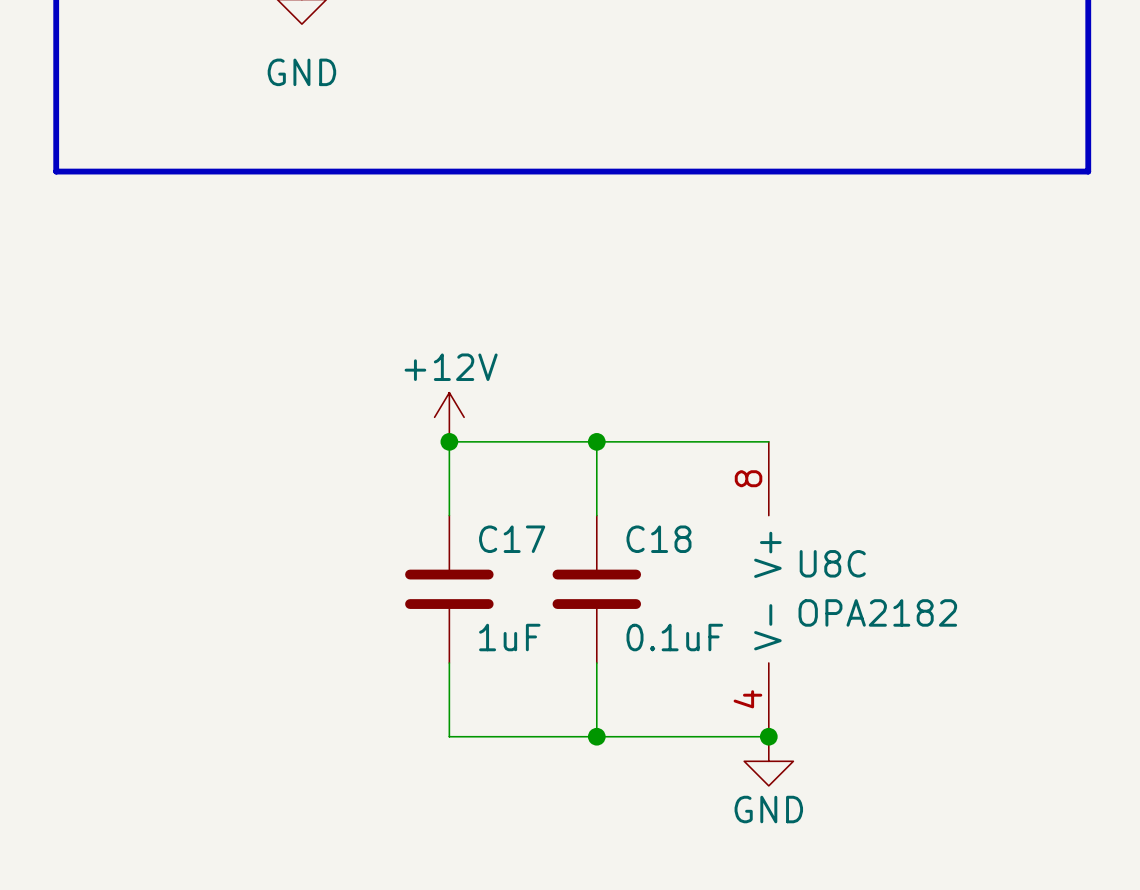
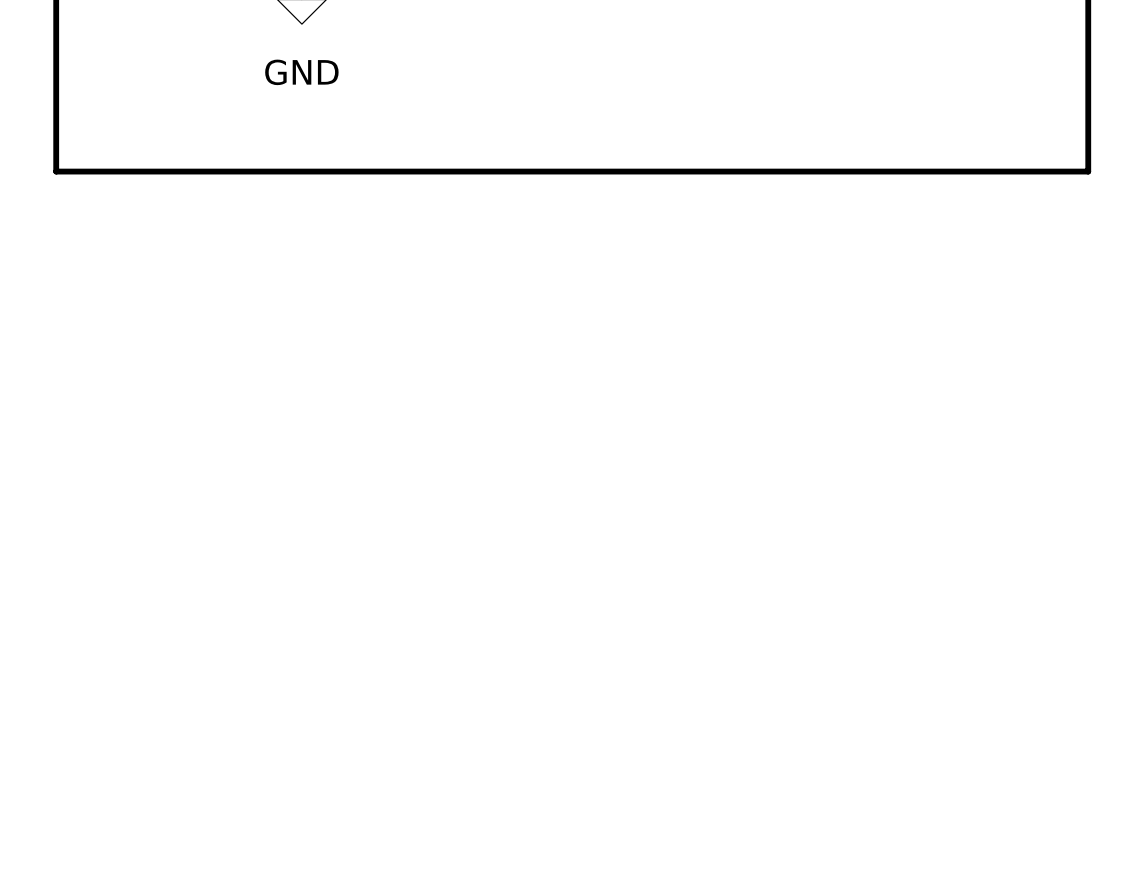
power symbol: +12V (449, 417) -> none
junction: (449, 441) -> none
wire: (596, 441) (596, 515) -> none
junction: (596, 441) -> none
wire: (768, 441) (449, 441) (449, 515) -> none
C17: 1uF (449, 589) -> none
C18: 0.1uF (596, 589) -> none
U8C: OPA2182 (768, 589) -> none
wire: (449, 663) (449, 736) (768, 736) -> none
wire: (596, 663) (596, 736) -> none
junction: (596, 736) -> none
junction: (768, 736) -> none
power symbol: GND (768, 761) -> none

